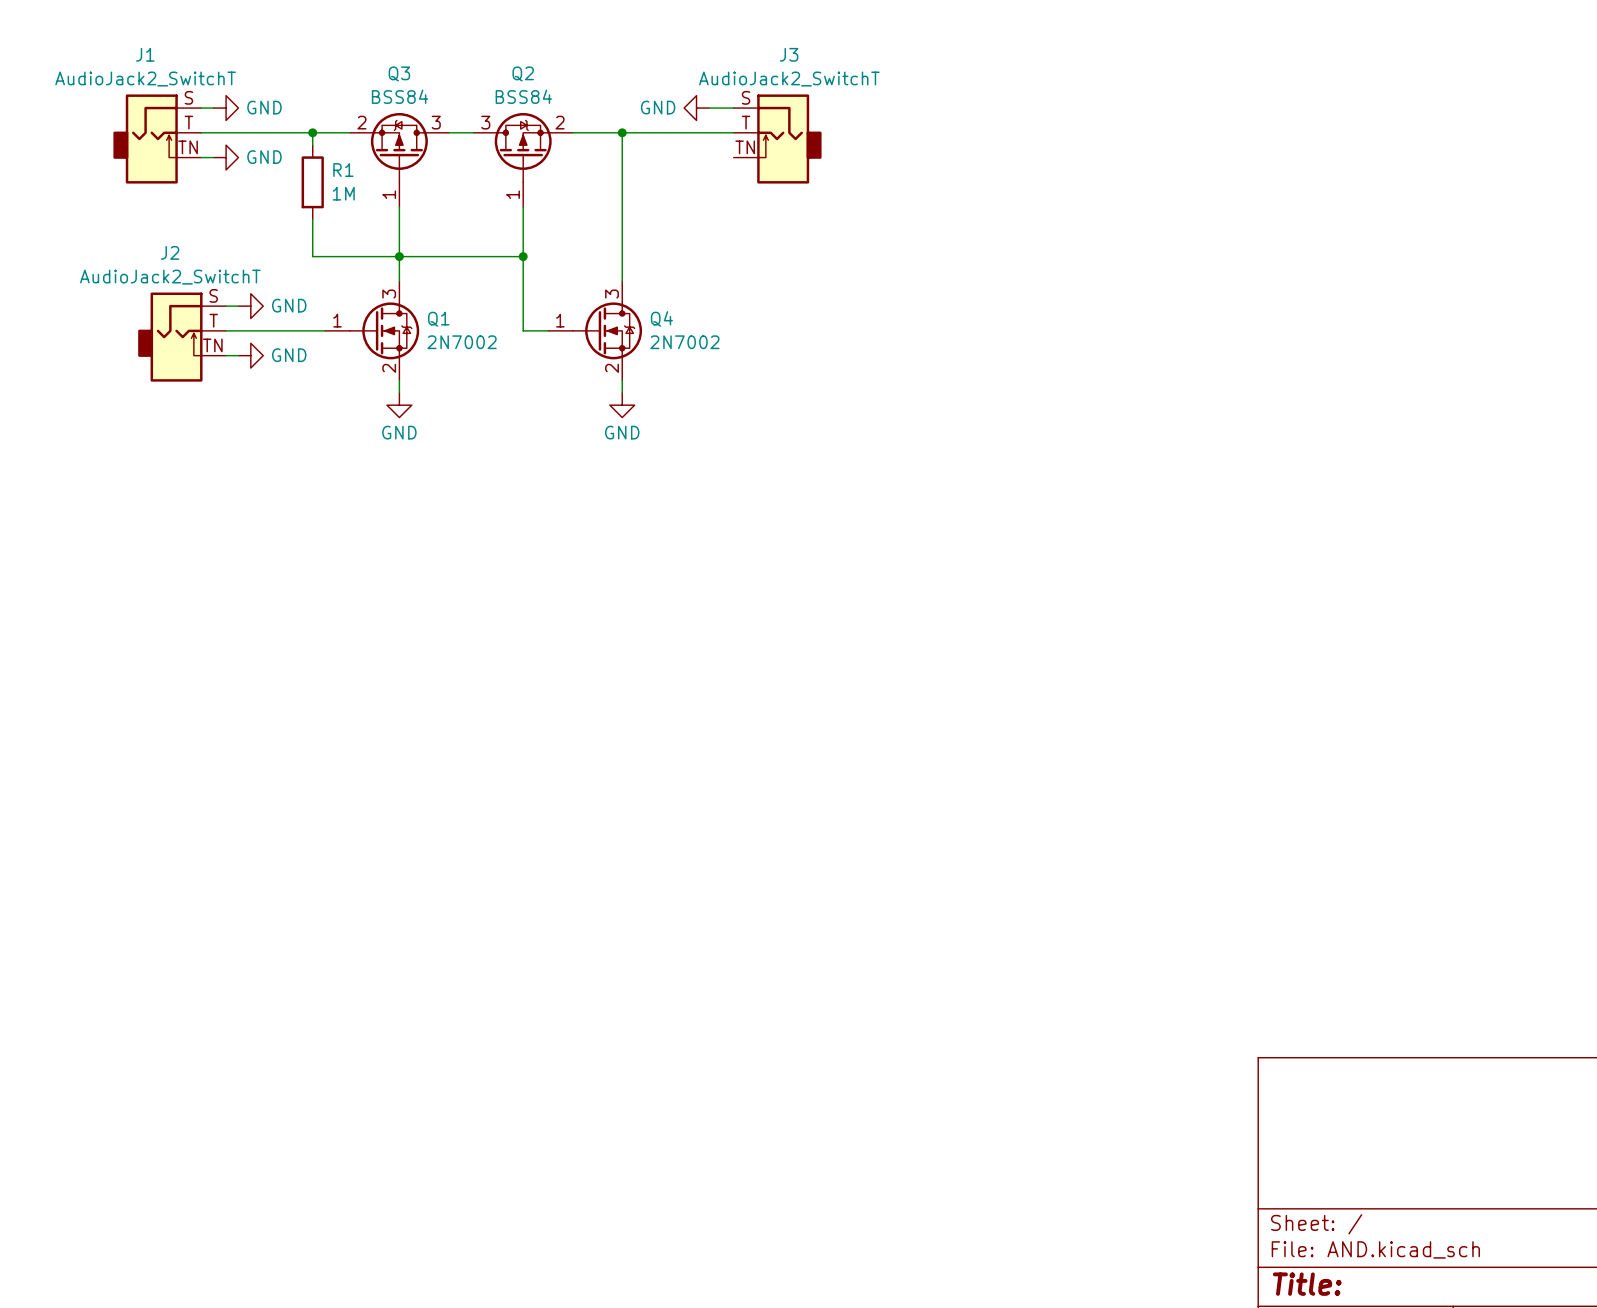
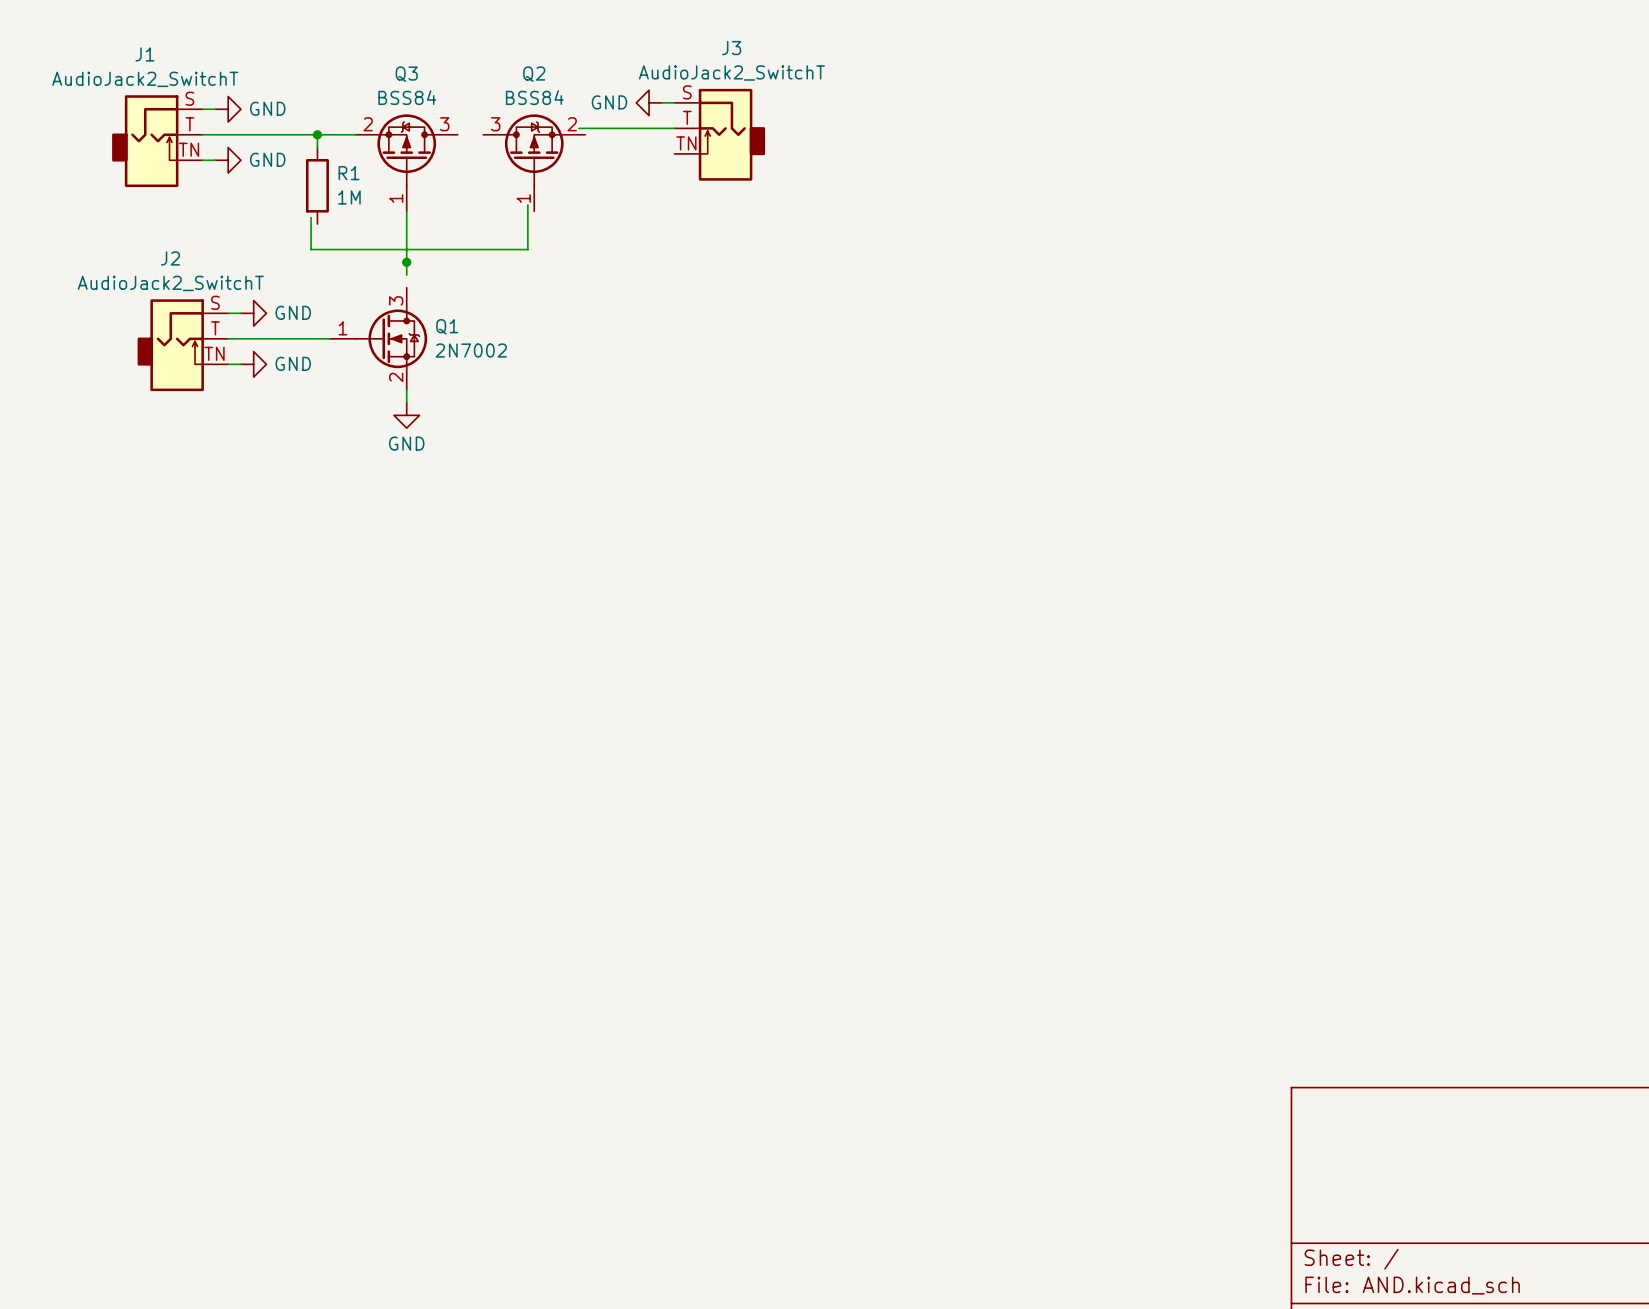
wire: none -> (661, 102) (674, 102)
power symbol position: GND (696, 108) -> GND (649, 102)
wire: none -> (578, 128) (674, 128)
wire: (448, 132) (473, 132) -> none
wire: (572, 132) (733, 132) -> none
wire: (622, 132) (622, 281) -> none
junction: (622, 132) -> none
J3 position: (777, 139) -> (719, 134)
wire: none -> (527, 204) (527, 249) (311, 249) (311, 217)
wire: (523, 207) (523, 330) (547, 330) -> none
wire: (312, 219) (312, 256) (523, 256) -> none
junction: (523, 256) -> none
wire: (399, 268) (399, 281) -> none
Q4: 2N7002 (595, 330) -> none
wire: (622, 380) (622, 392) -> none
power symbol: GND (622, 405) -> none

